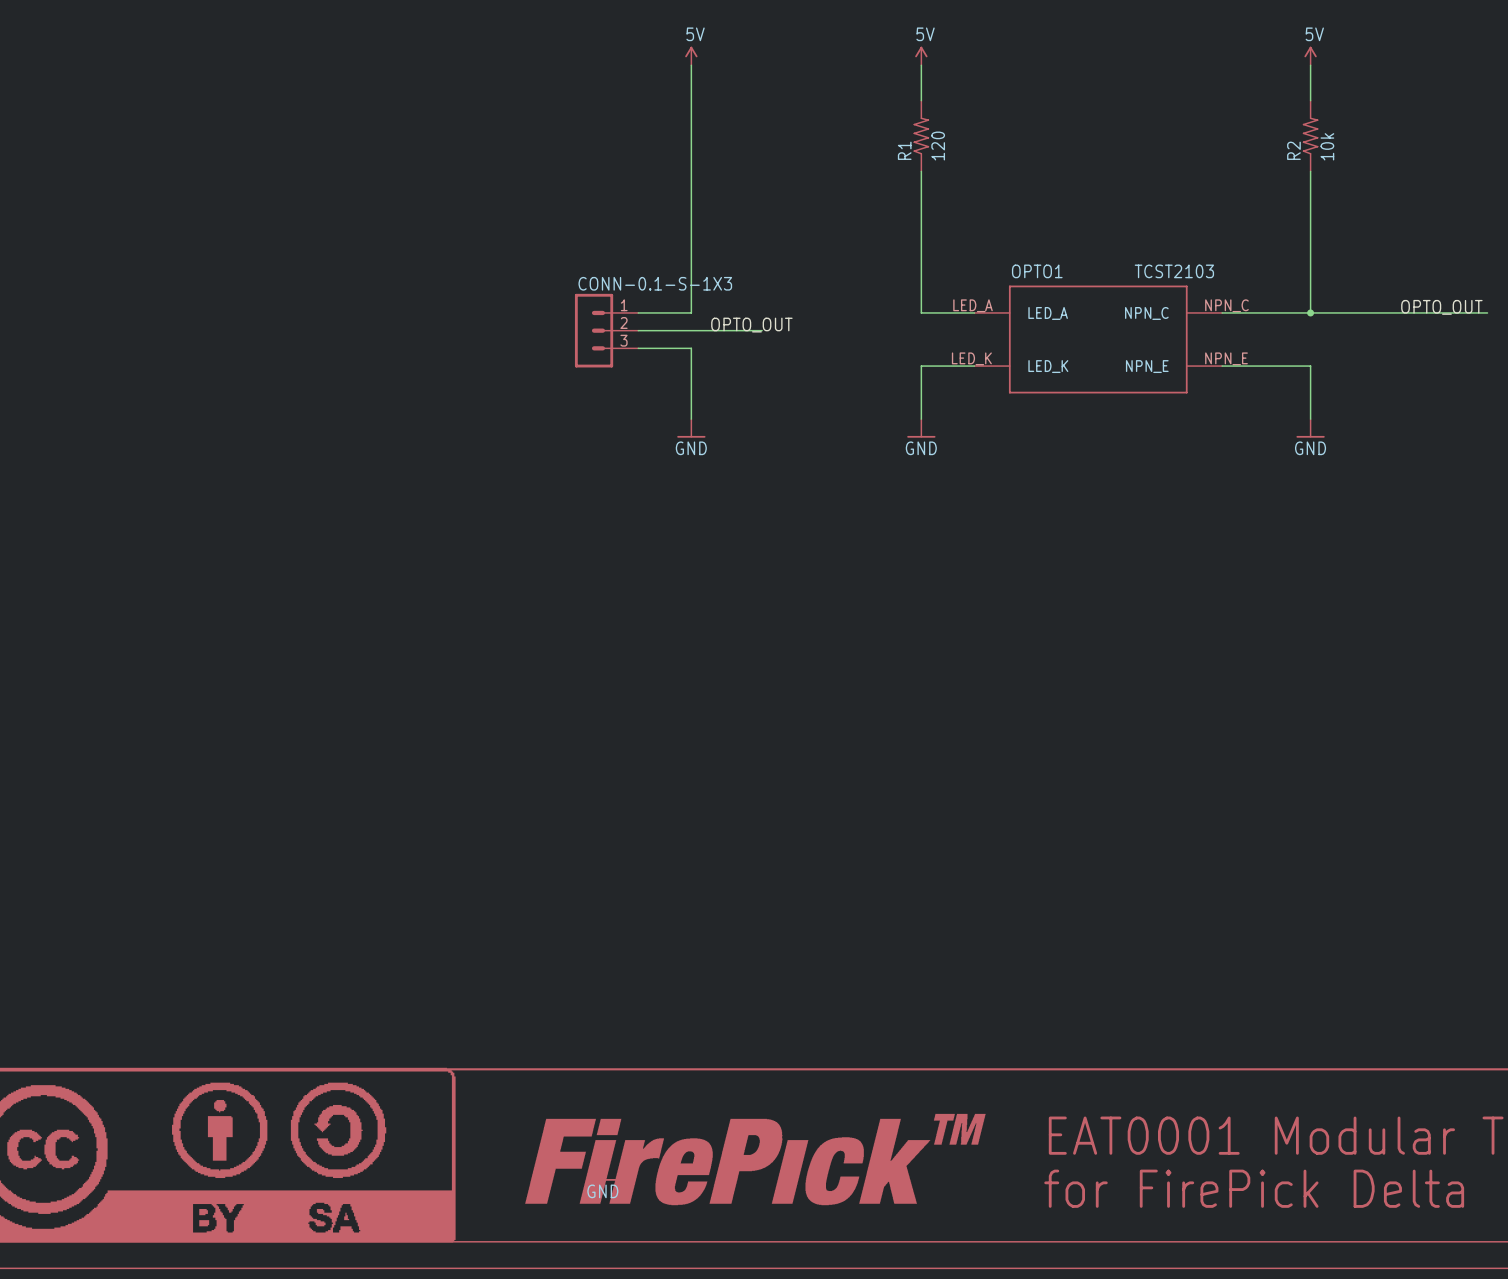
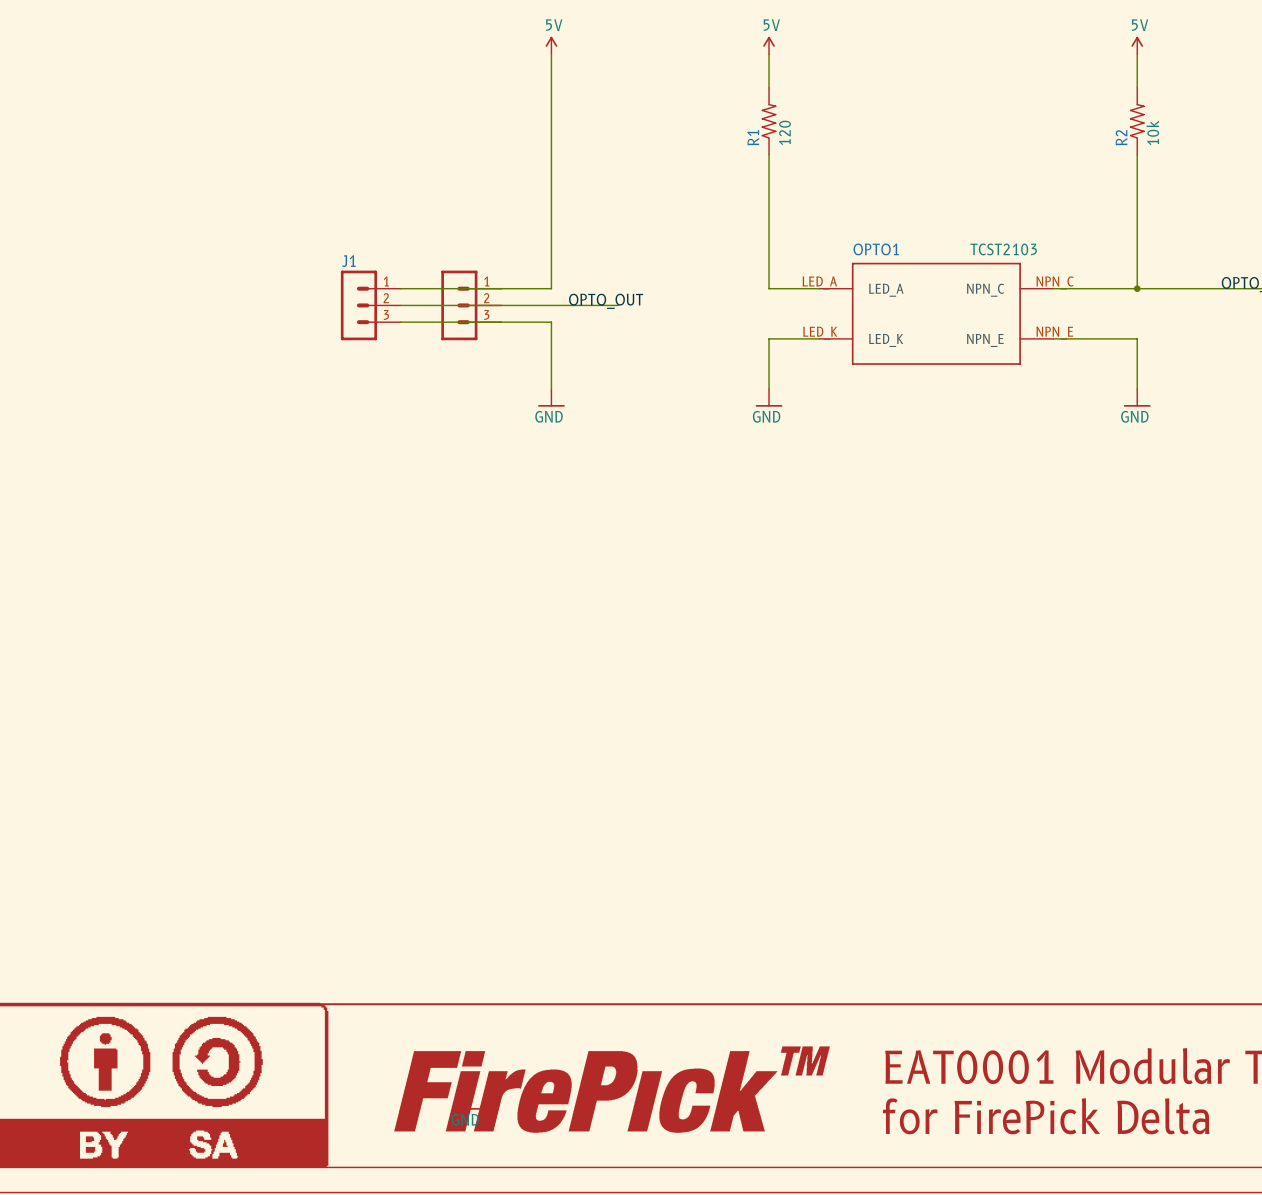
part value: CONN-0.1-S-1X3 (655, 283) -> none
wire: none -> (400, 288) (501, 288)
J1: none -> (370, 305)
wire: none -> (400, 305) (501, 305)
wire: none -> (400, 322) (501, 322)

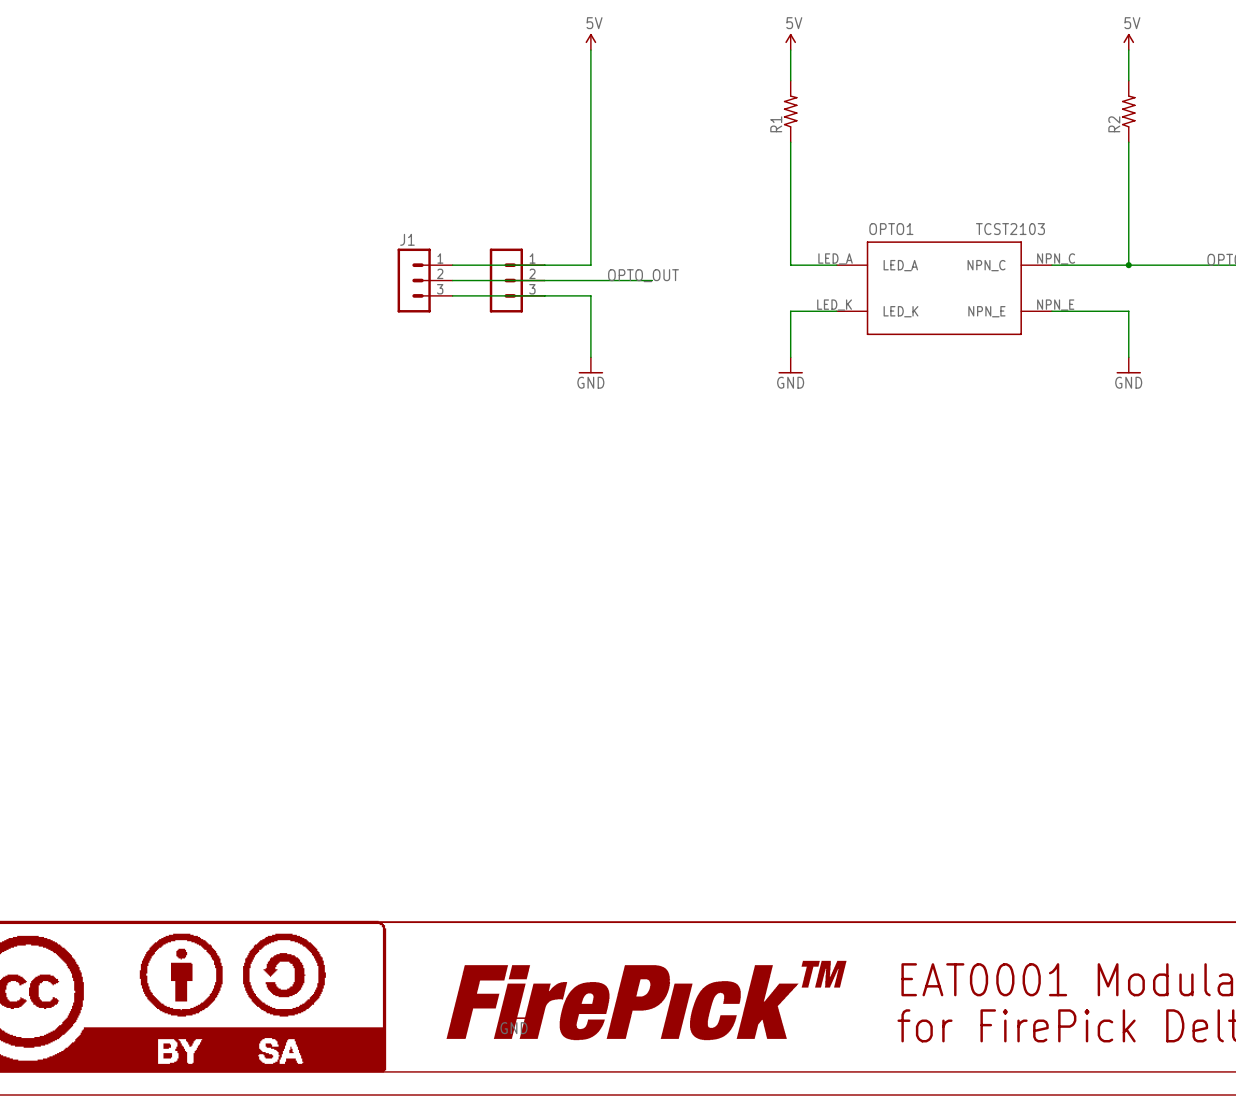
R1 value: 120 (784, 132) -> none
R2 value: 10k (1152, 132) -> none

